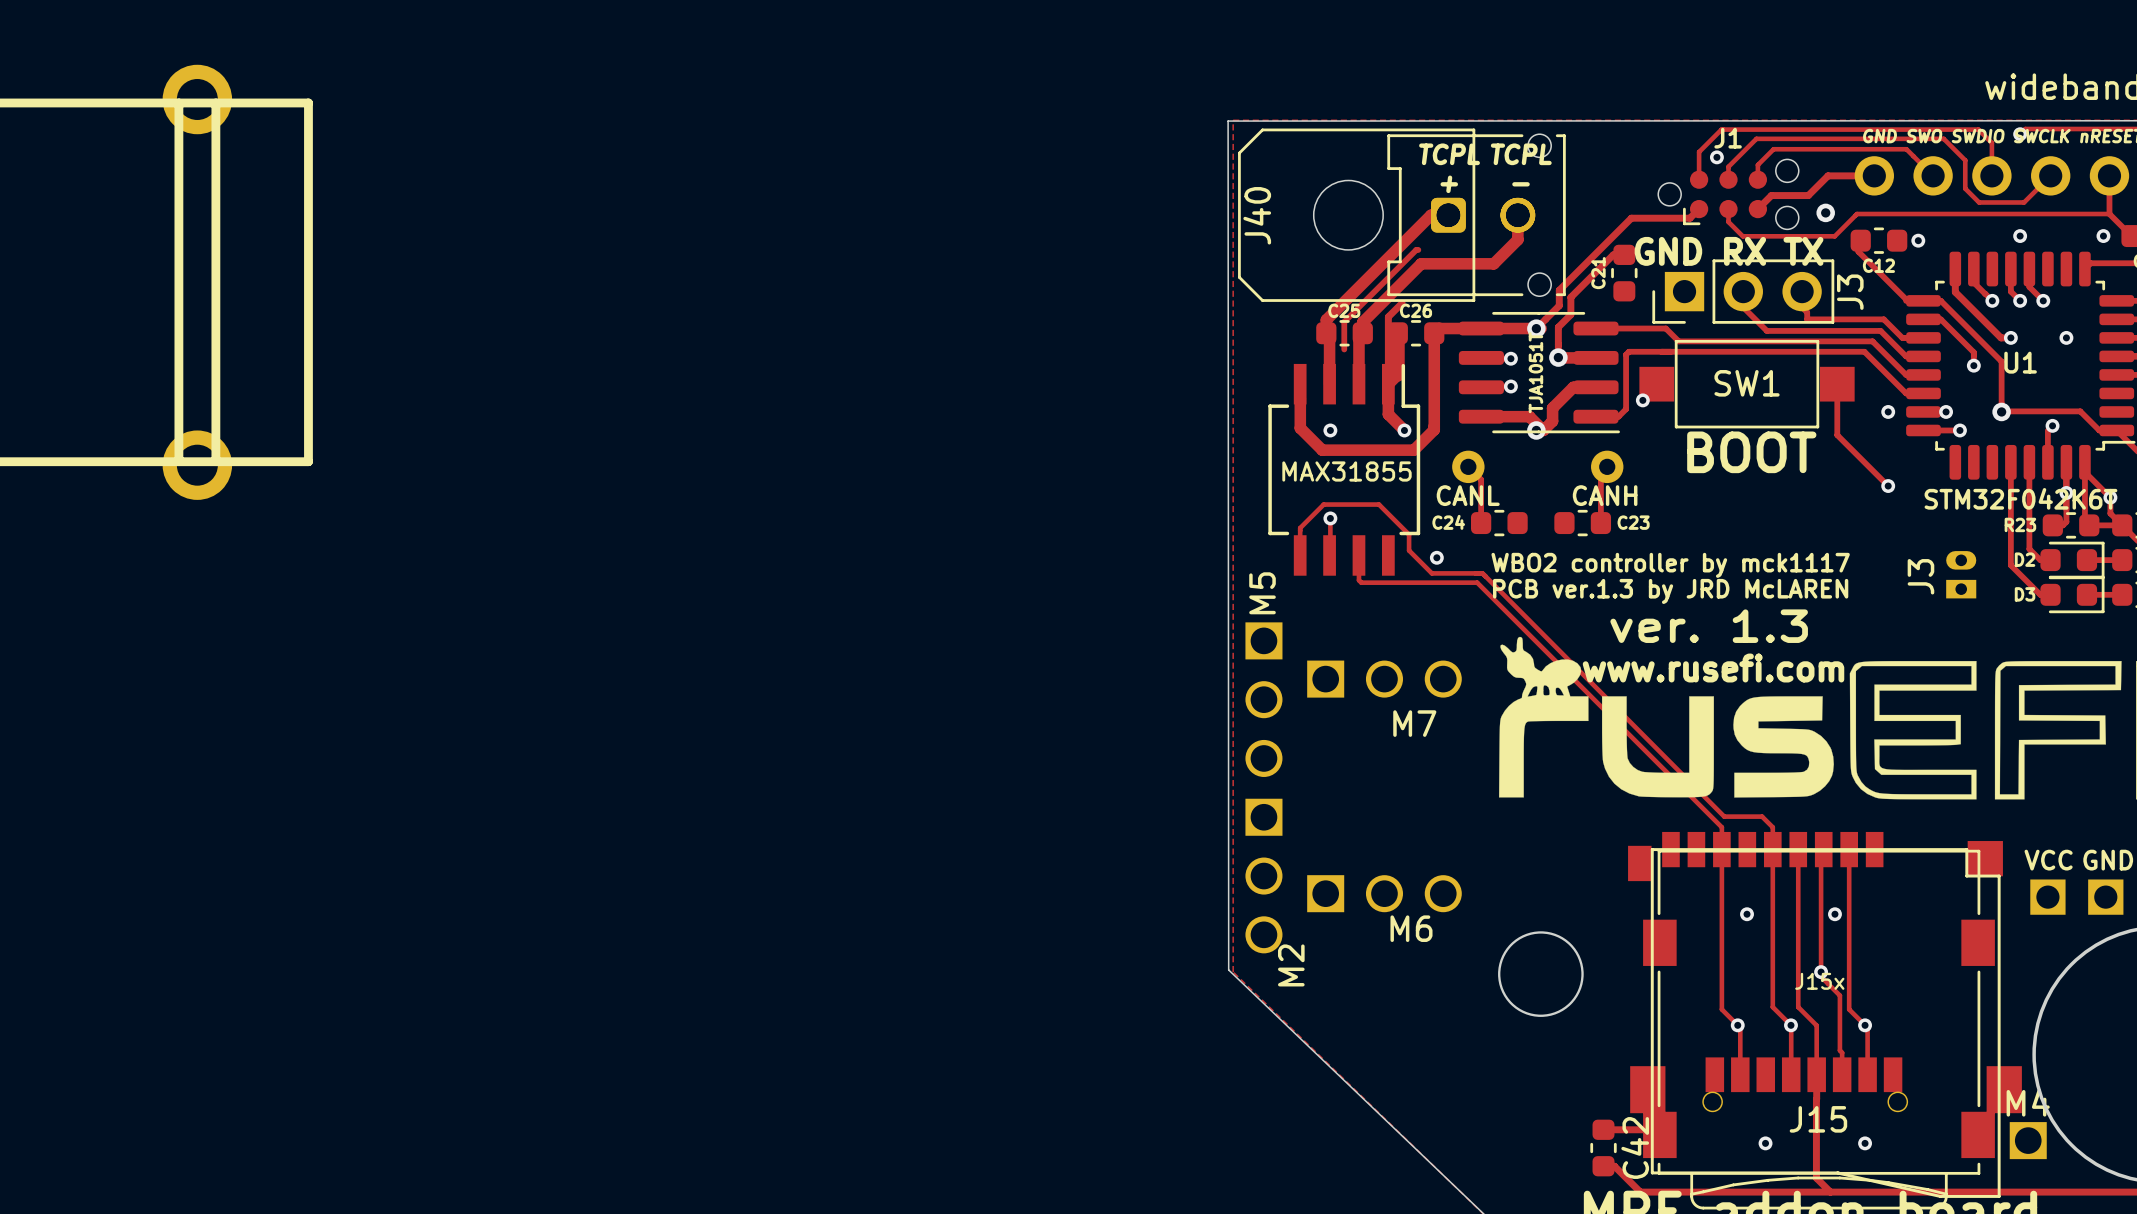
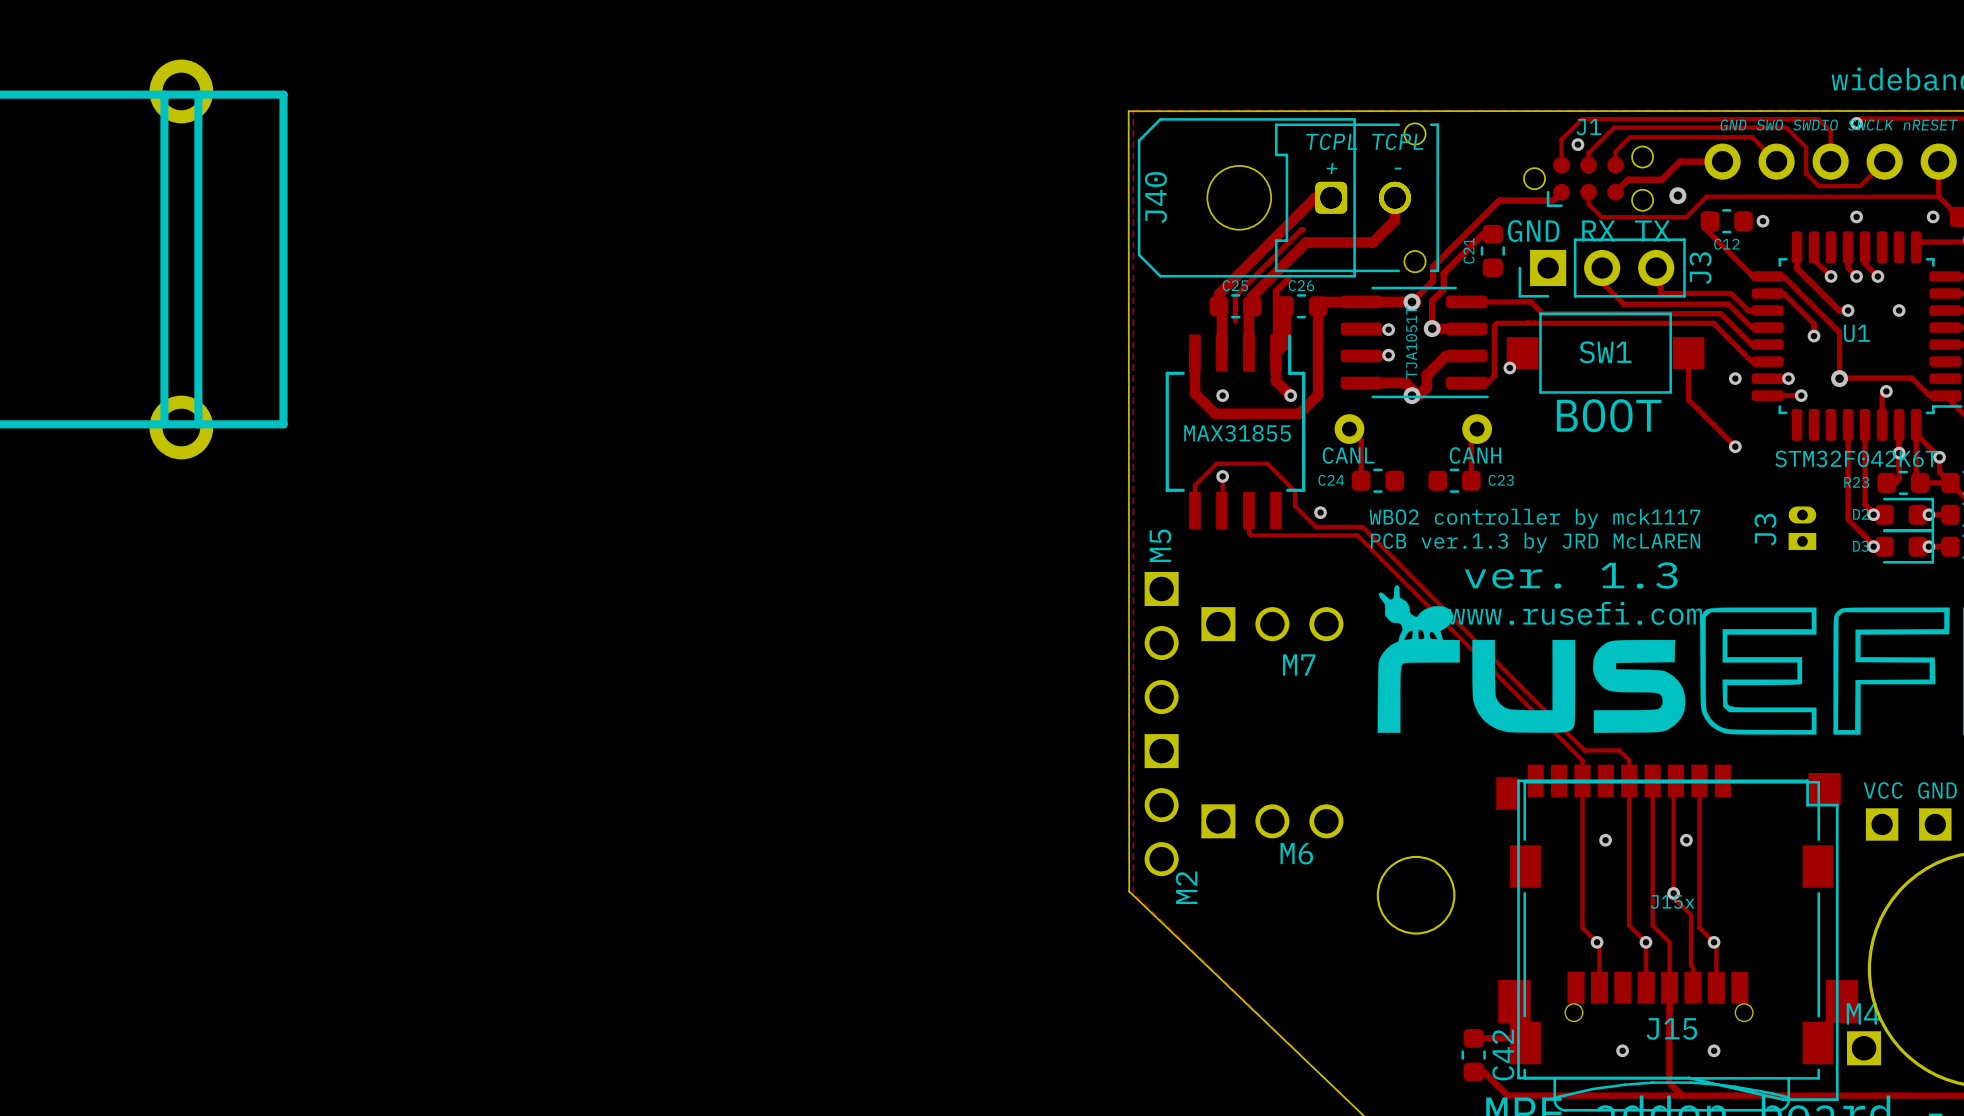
via: none -> (1873, 514)
via: none -> (1928, 514)
via: none -> (1873, 546)
via: none -> (1928, 546)

